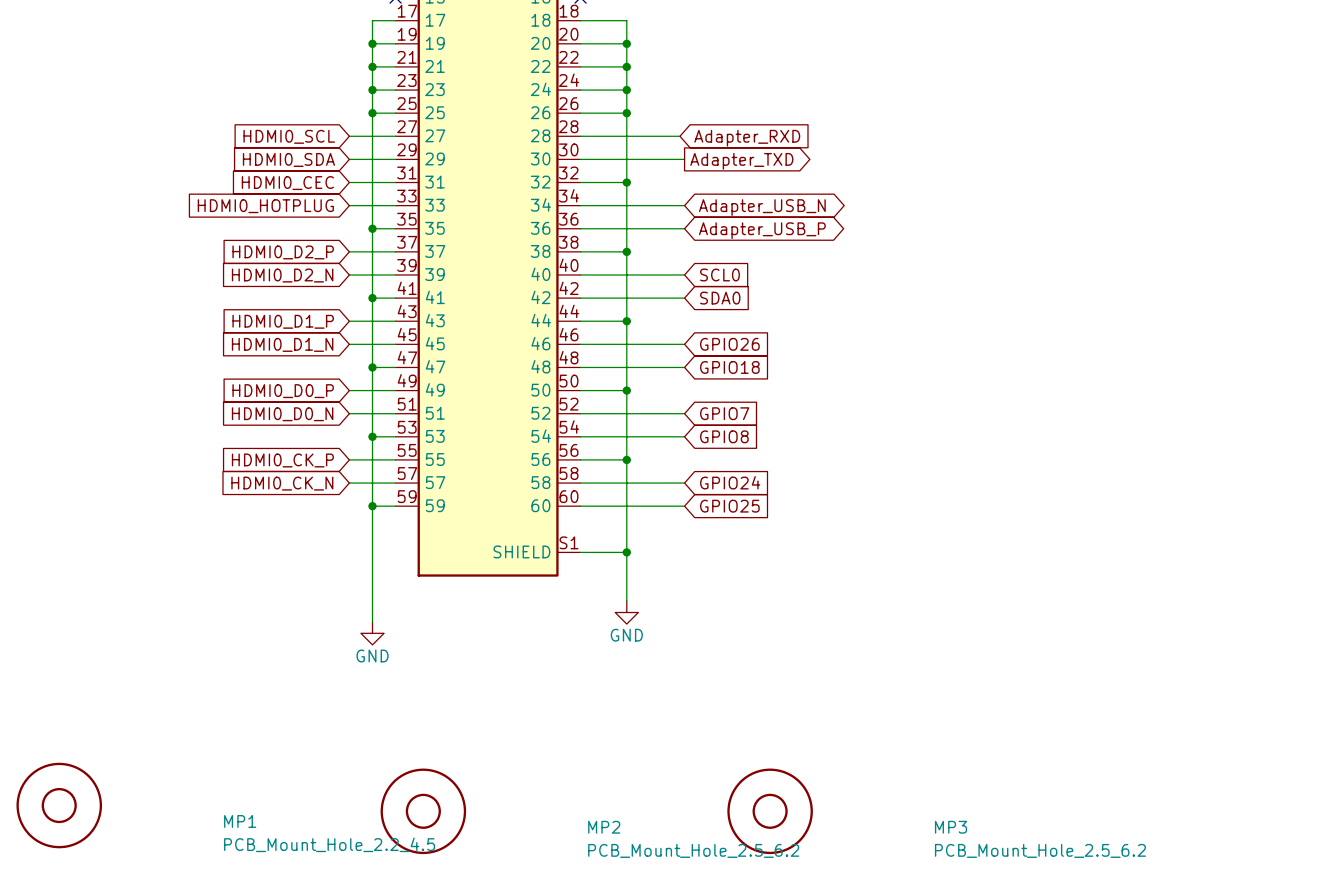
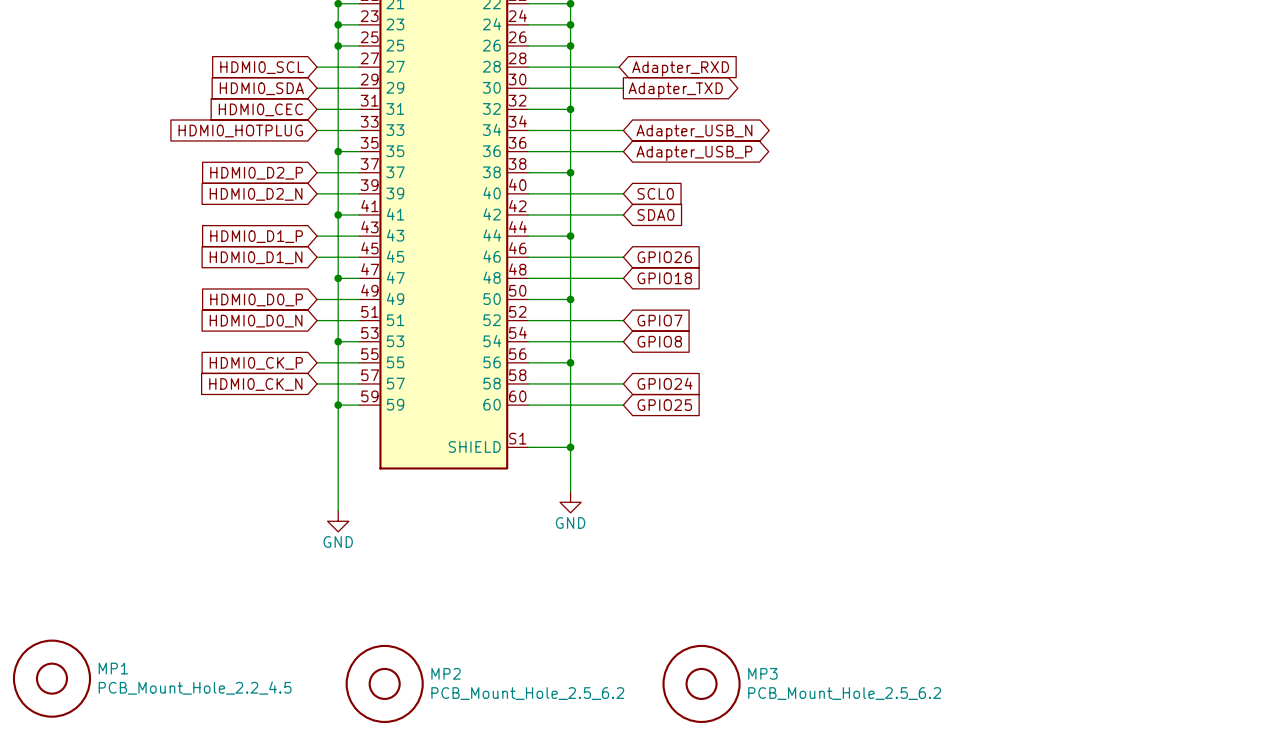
MP1 name position: MP1 (240, 821) -> MP1 (113, 668)
MP2 name position: MP2 (604, 827) -> MP2 (446, 673)
MP3 name position: MP3 (951, 827) -> MP3 (762, 673)
MP1 value position: PCB_Mount_Hole_2.2_4.5 (329, 844) -> PCB_Mount_Hole_2.2_4.5 (195, 688)
MP2 value position: PCB_Mount_Hole_2.5_6.2 (693, 850) -> PCB_Mount_Hole_2.5_6.2 (527, 693)
MP3 value position: PCB_Mount_Hole_2.5_6.2 (1040, 850) -> PCB_Mount_Hole_2.5_6.2 (844, 693)

